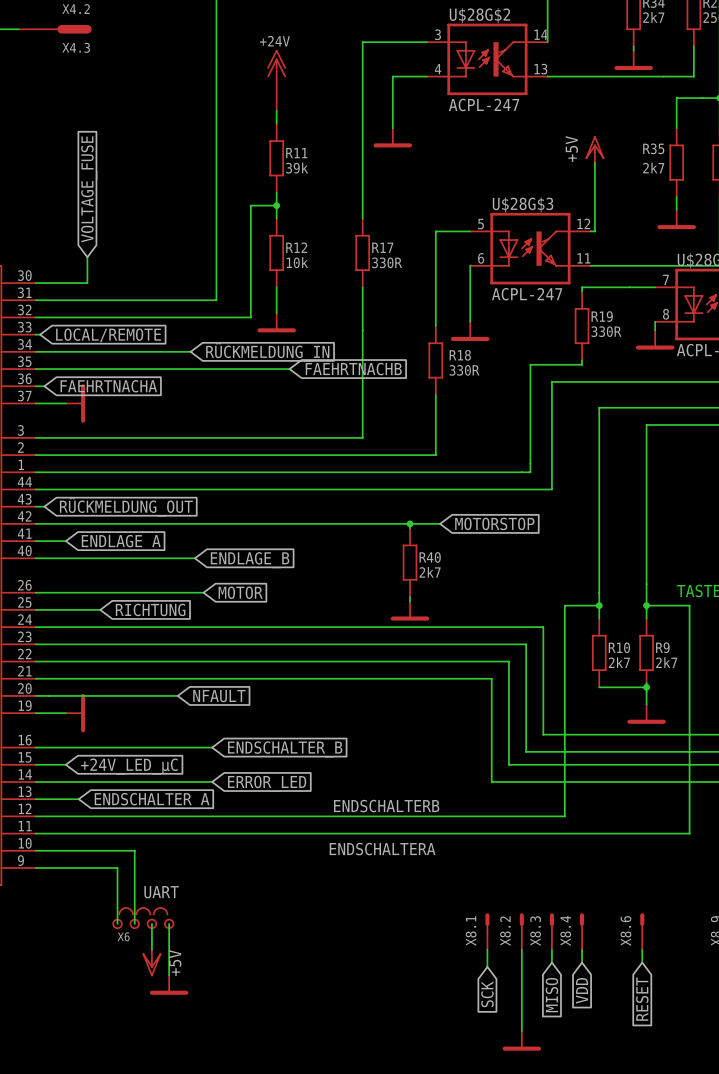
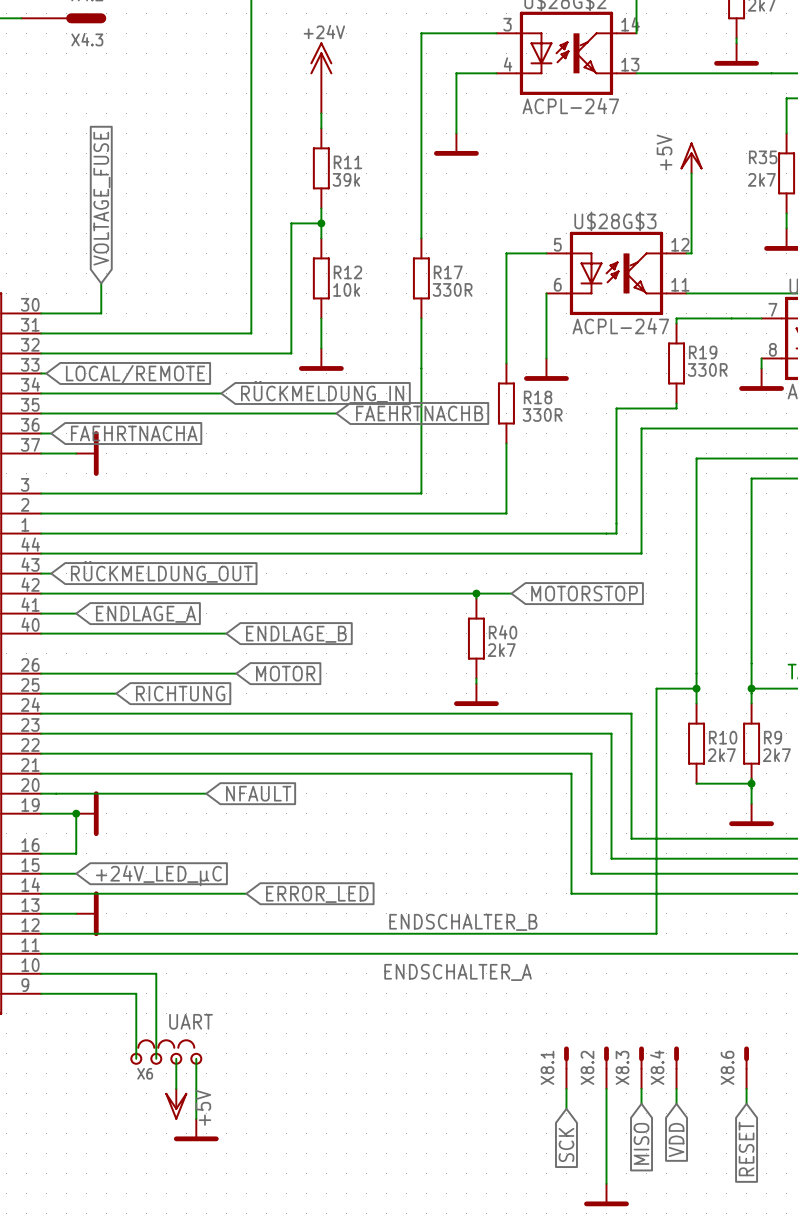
junction: none -> (76, 813)
wire: (65, 747) (212, 747) -> (76, 853) (76, 813)
global label: ENDSCHALTER_B (285, 749) -> none
power symbol: none -> (87, 913)
global label: ENDSCHALTER_A (152, 801) -> none
label: ENDSCHALTERB (386, 806) -> ENDSCHALTER_B (463, 922)
label: ENDSCHALTERA (382, 849) -> ENDSCHALTER_A (458, 972)

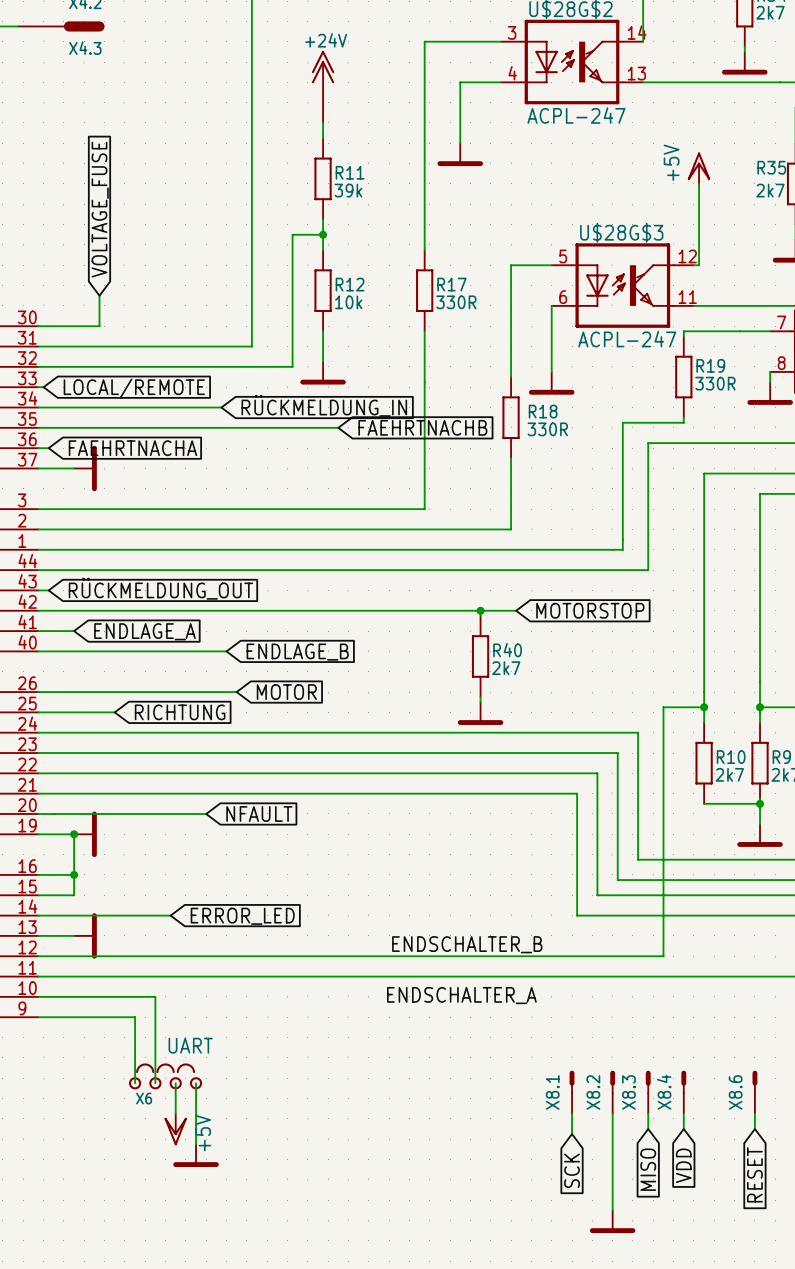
wire: none -> (74, 874) (74, 895)
junction: none -> (74, 874)
global label: +24V_LED_µC (158, 875) -> none
wire: (171, 893) (246, 893) -> none
global label position: ERROR_LED (317, 894) -> ERROR_LED (242, 916)

